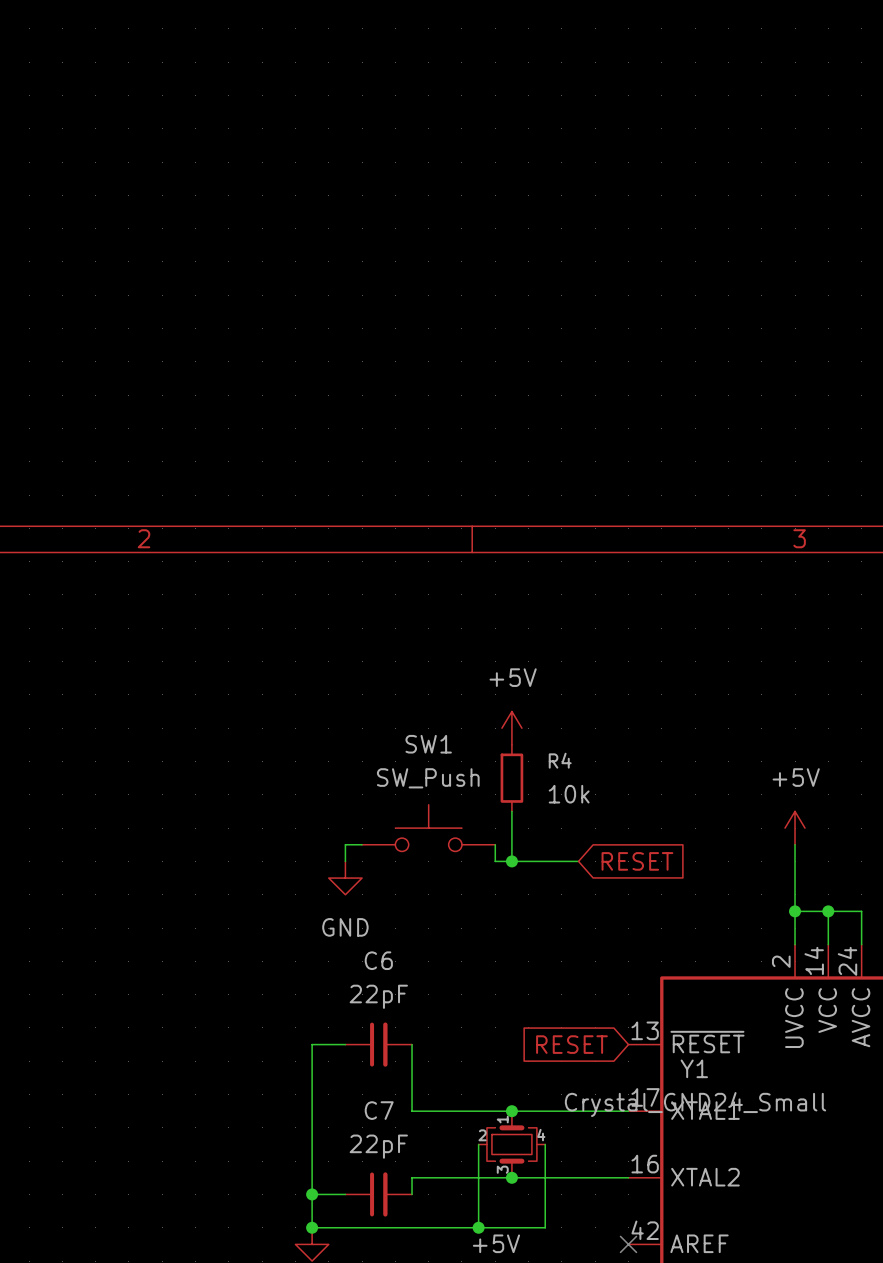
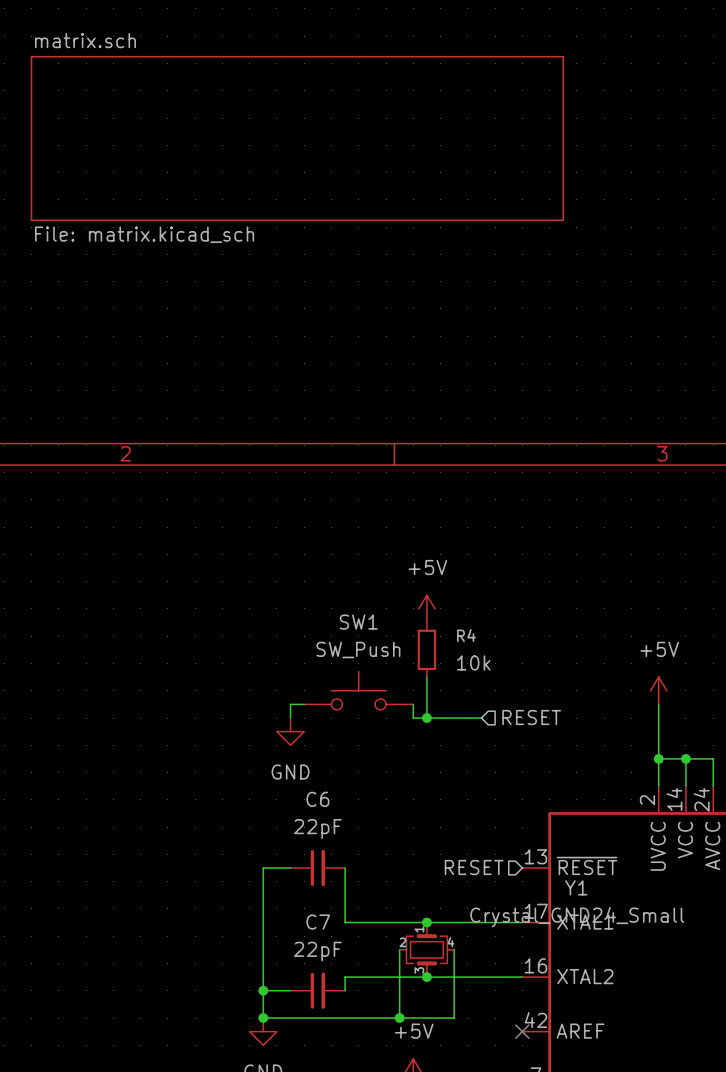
sheet matrix.sch: none -> File: matrix.kicad_sch (297, 138)
hierarchical label: none -> RESET (531, 717)
global label: RESET (637, 861) -> none
hierarchical label: none -> RESET (474, 867)
global label: RESET (571, 1044) -> none

